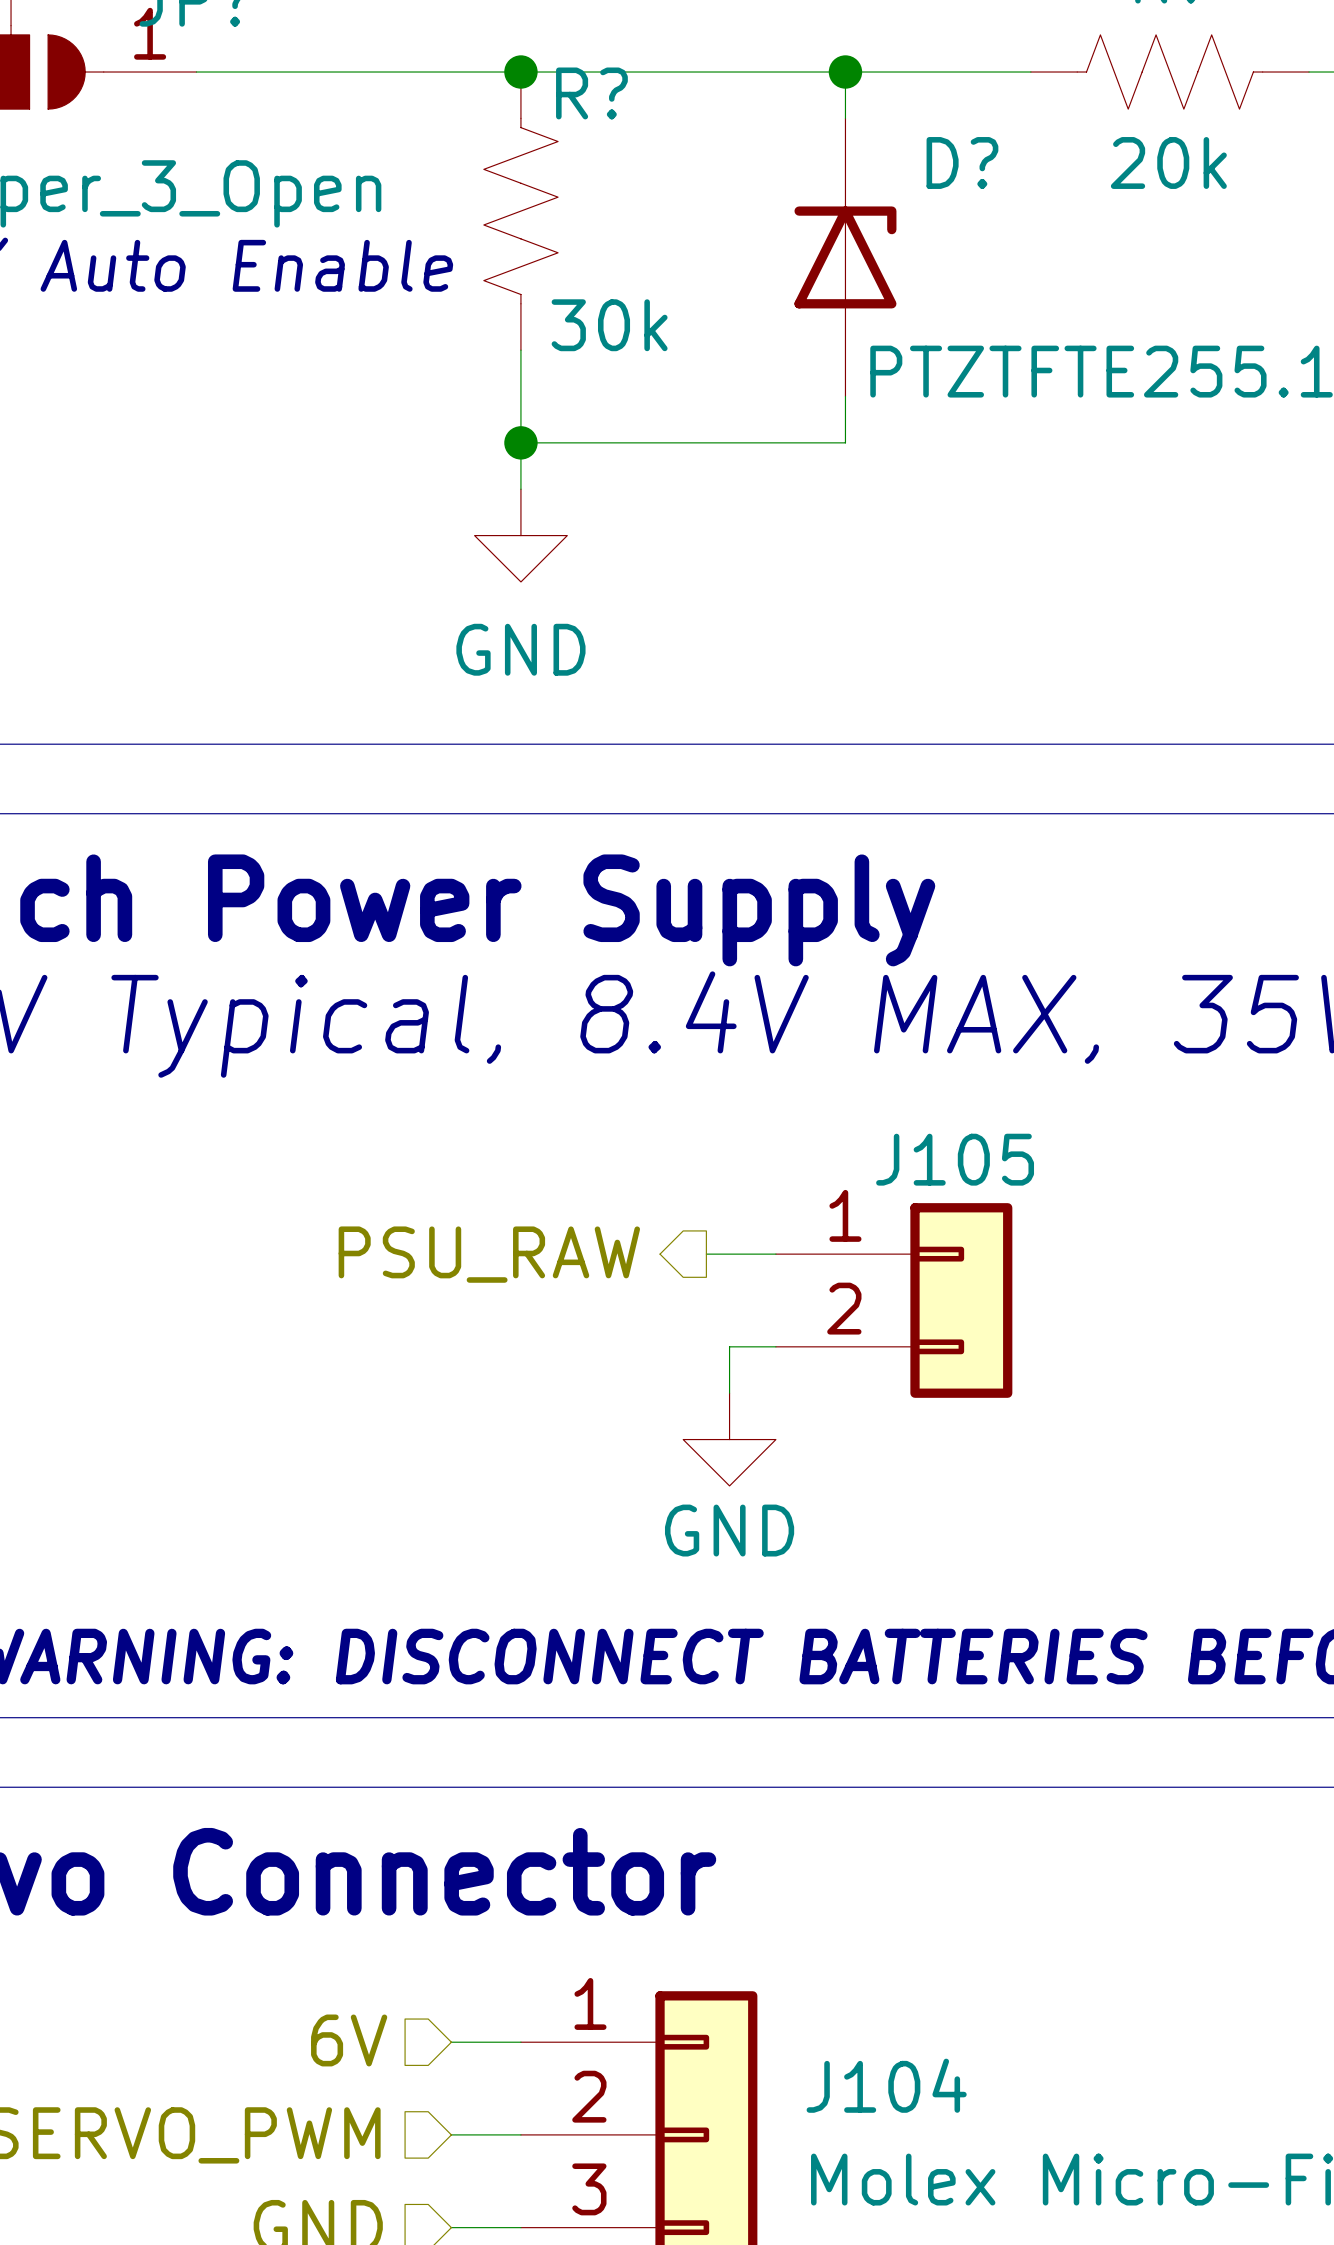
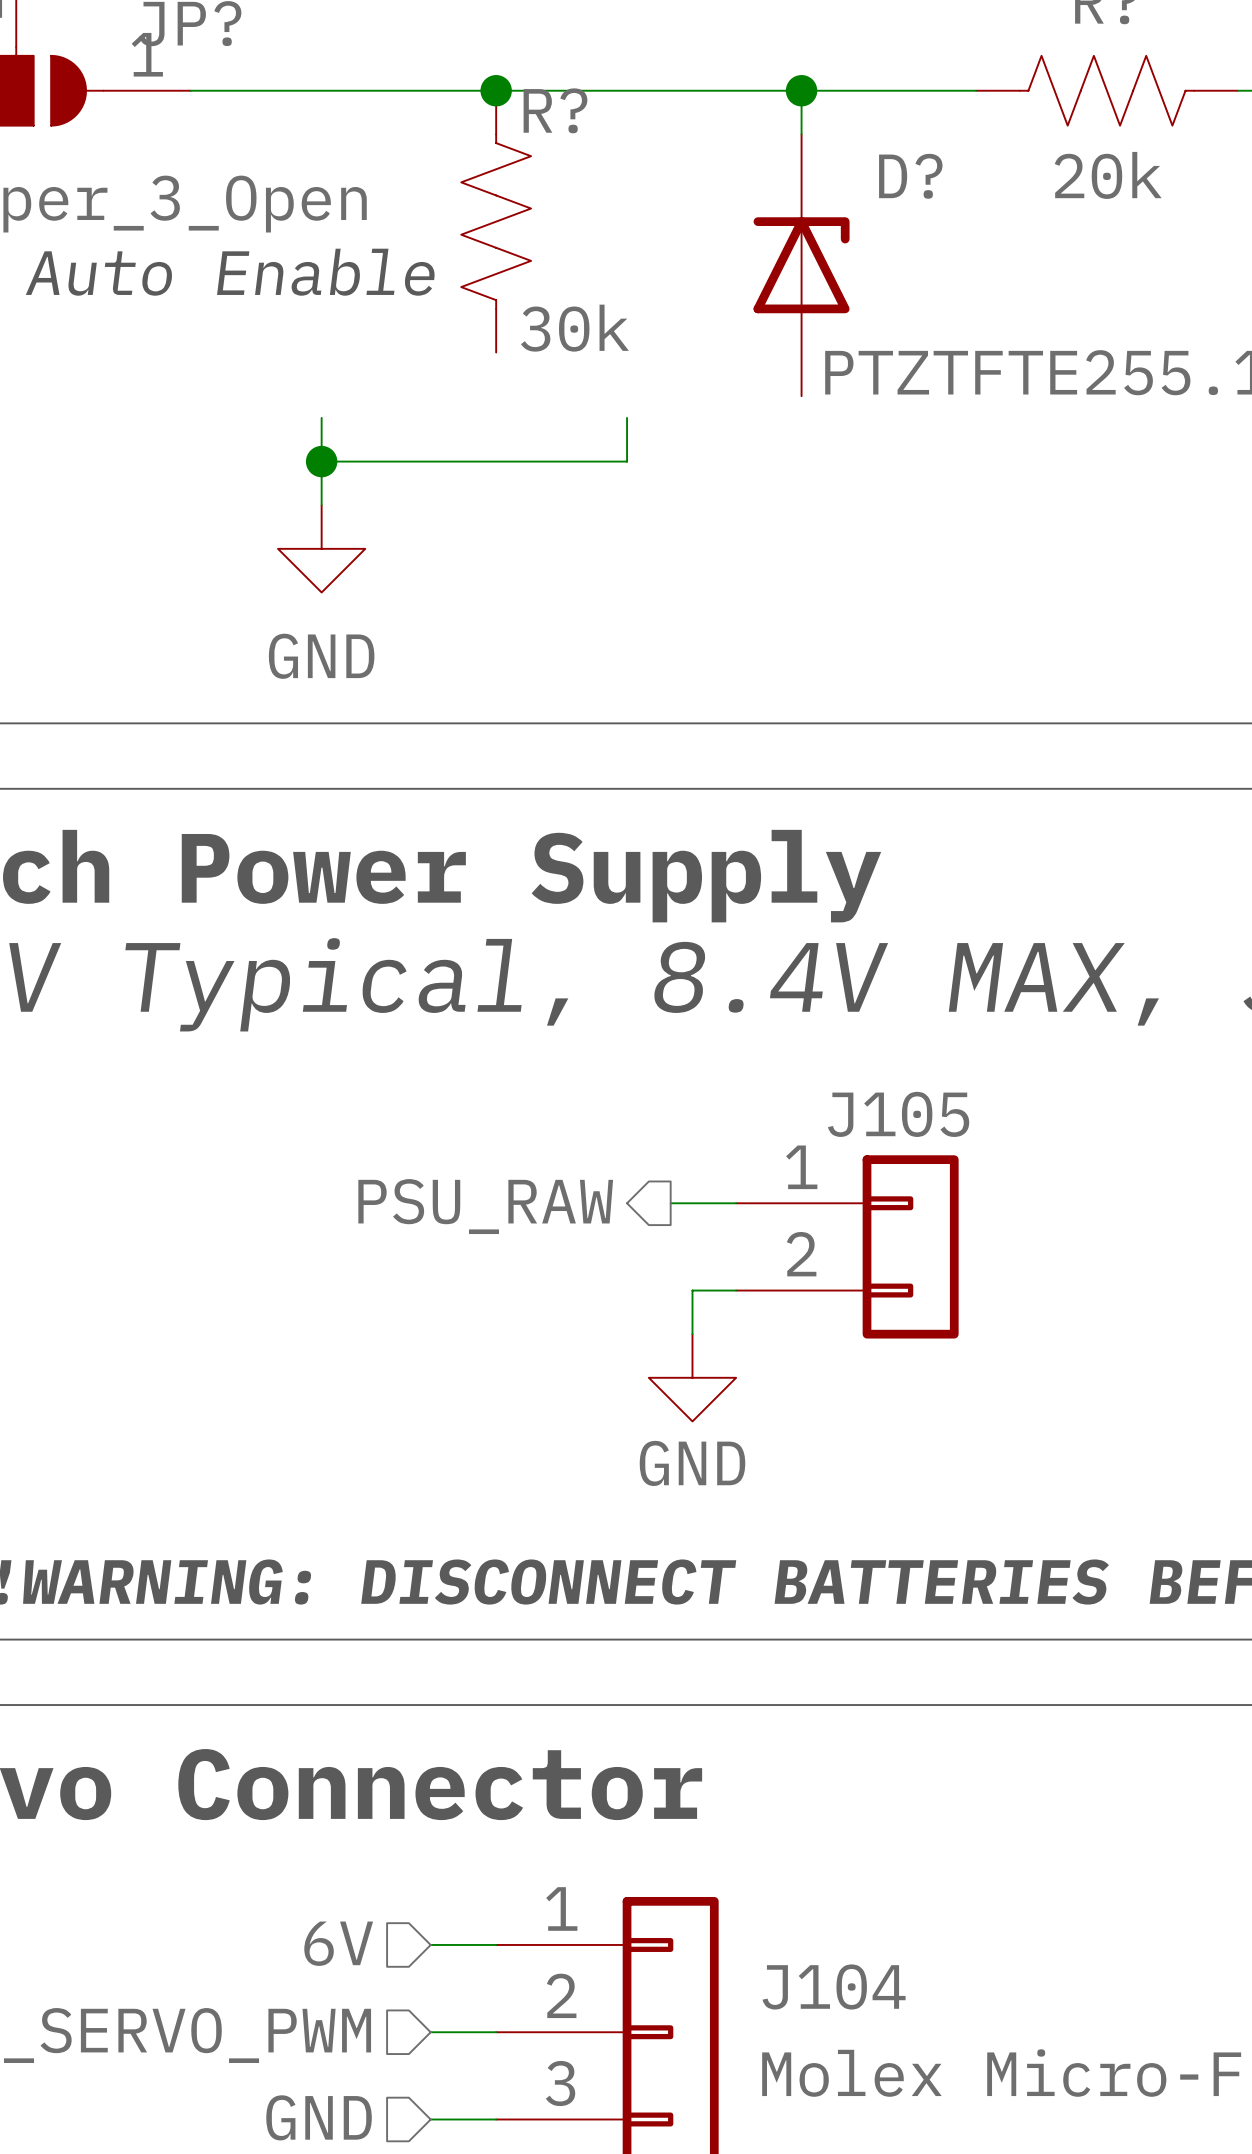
wire: (520, 350) (520, 489) -> none
wire: (845, 396) (845, 442) (520, 442) -> (627, 417) (627, 461) (321, 461)
wire: none -> (321, 417) (321, 505)
junction position: (520, 442) -> (321, 461)
power symbol position: GND (520, 535) -> GND (321, 548)

